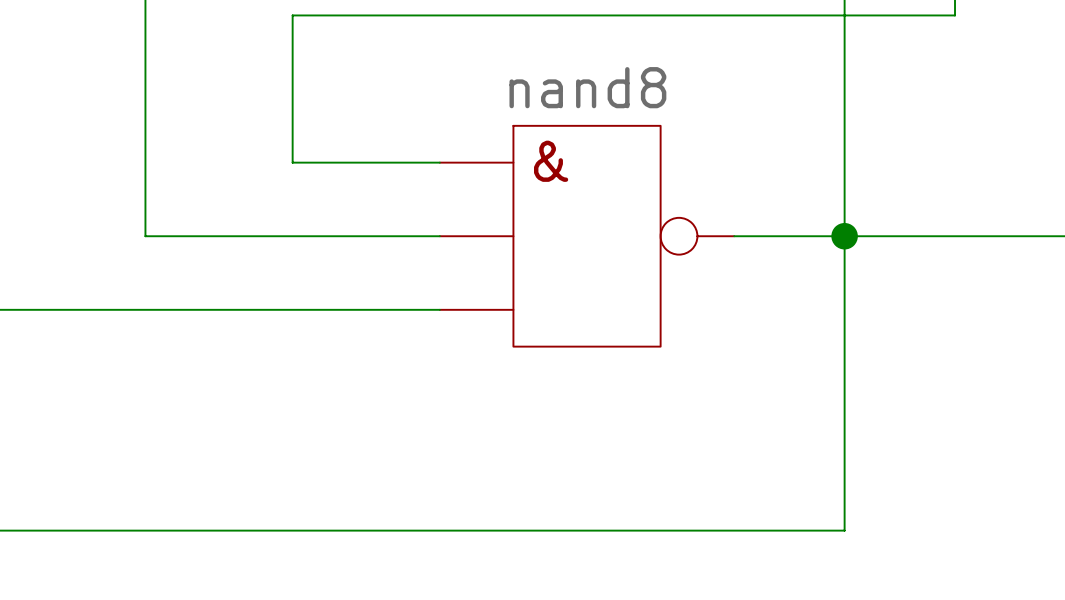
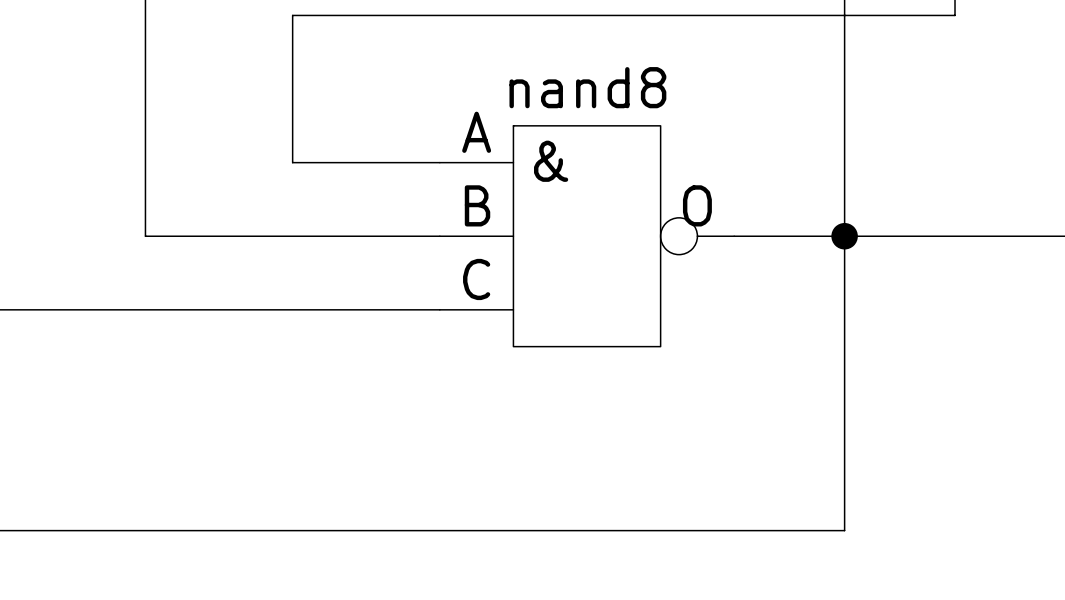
nand8 pin number: none -> A (476, 132)
nand8 pin number: none -> B (477, 205)
nand8 pin number: none -> O (697, 205)
nand8 pin number: none -> C (476, 279)

